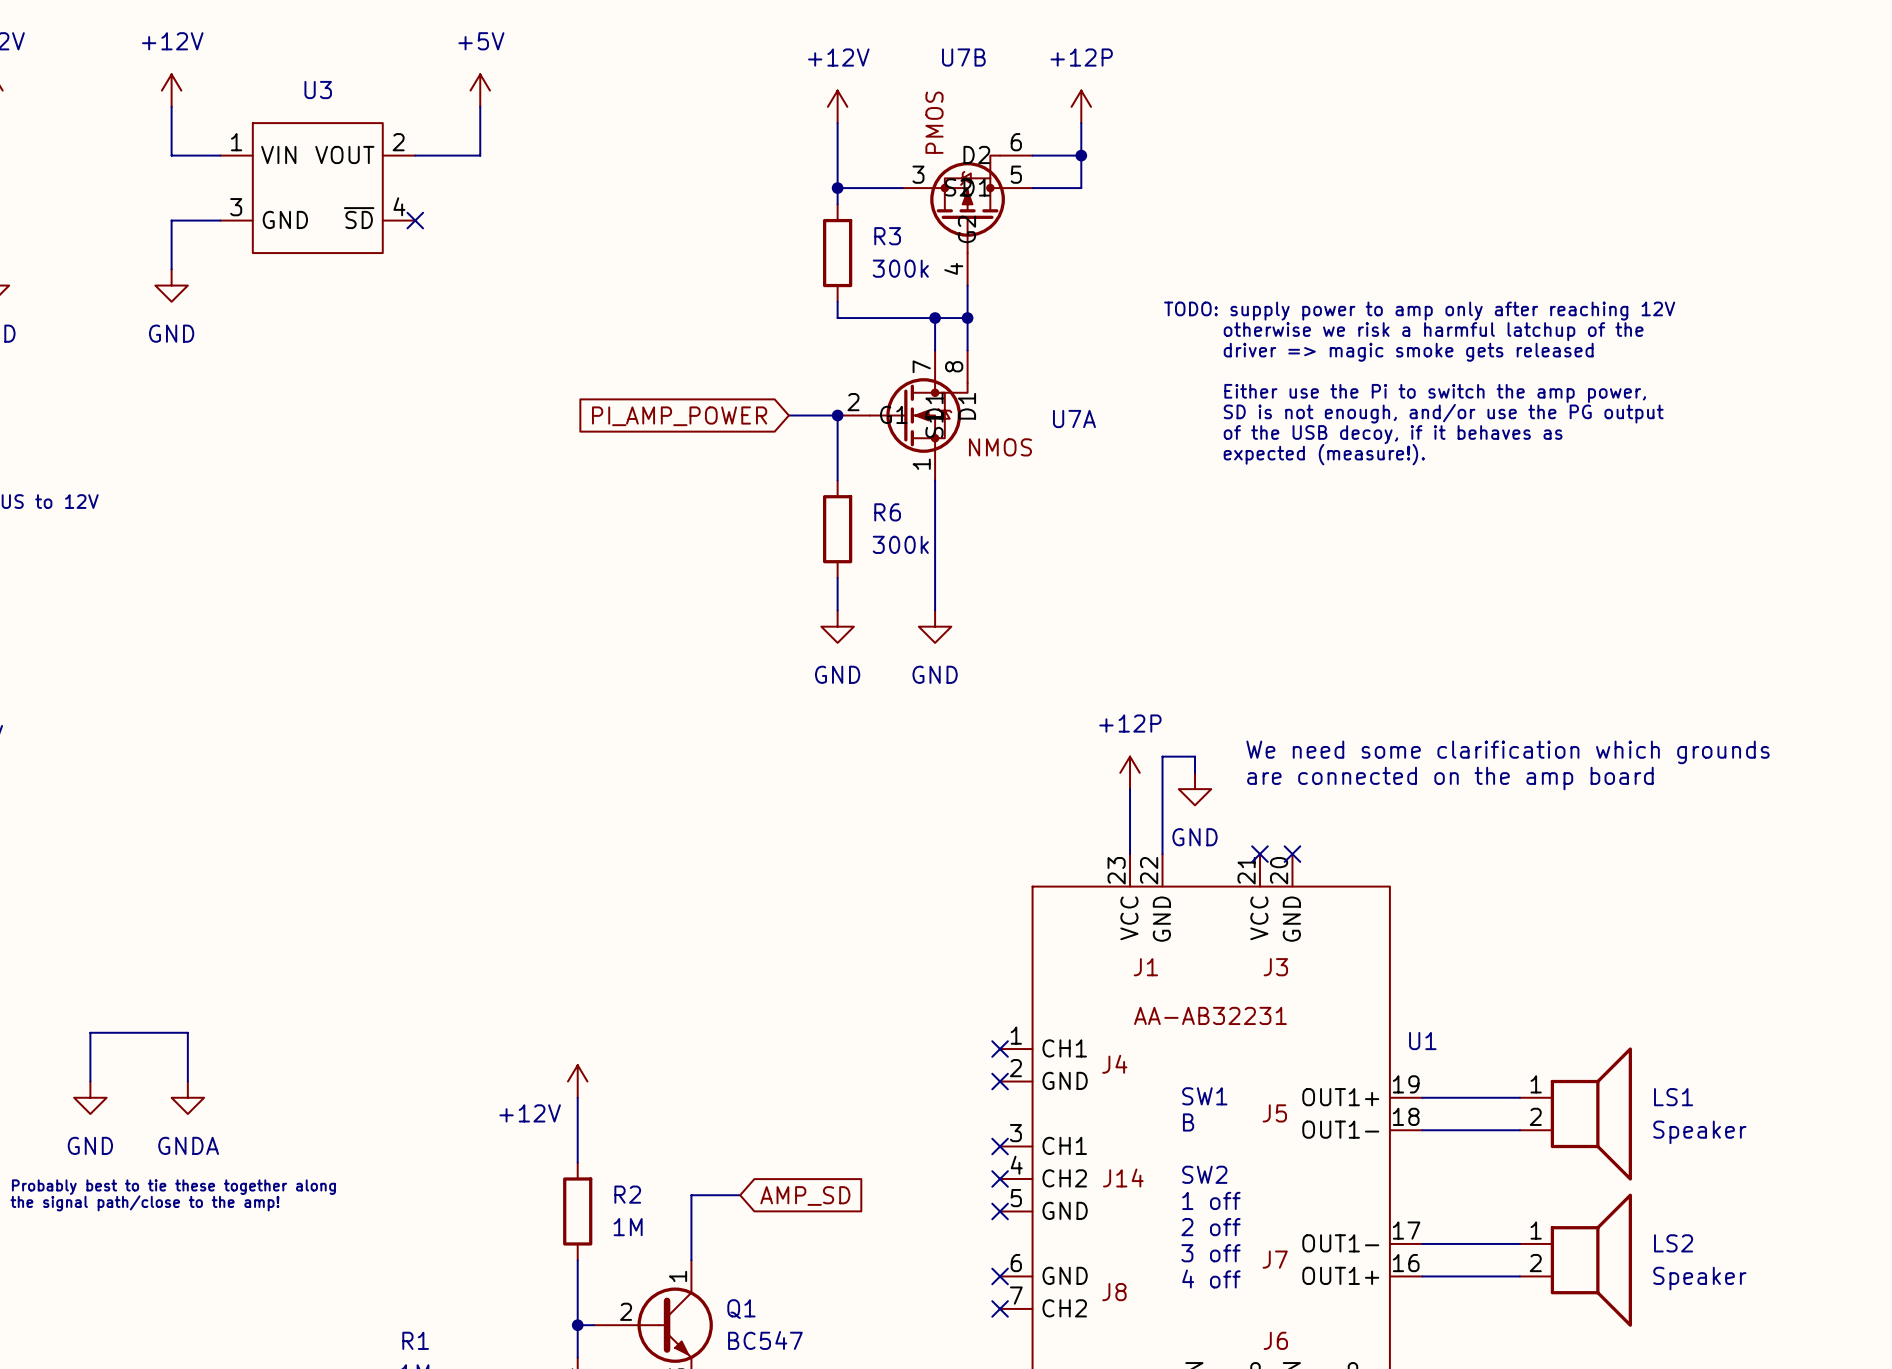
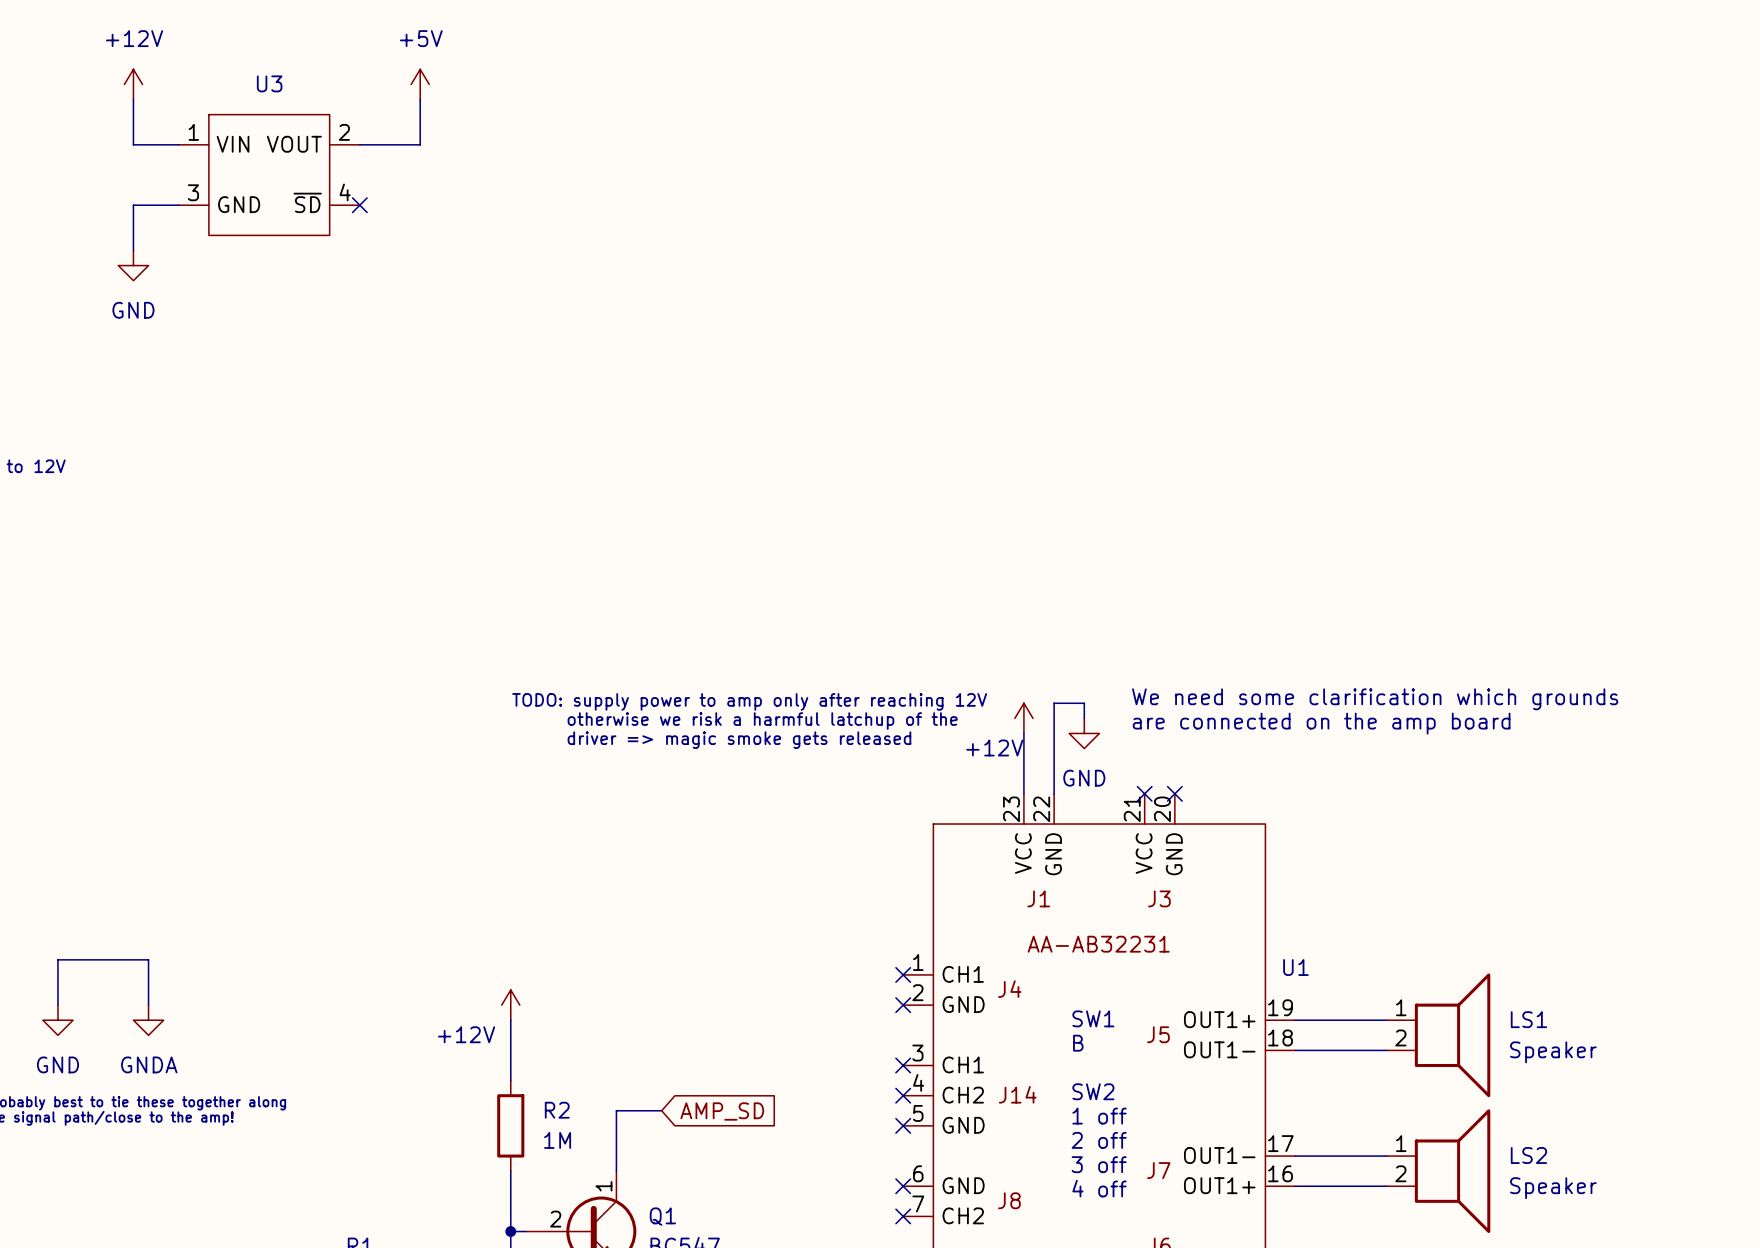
power symbol: +12V (837, 106) -> none
power symbol: +12P (1081, 106) -> none
wire: (837, 123) (837, 204) -> none
wire: (1081, 123) (1081, 188) (1032, 188) -> none
wire: (1032, 155) (1081, 155) -> none
junction: (1081, 155) -> none
wire: (837, 188) (902, 188) -> none
junction: (837, 188) -> none
U7B: (967, 220) -> none
R3: 300k (837, 253) -> none
wire: (967, 285) (967, 350) -> none
wire: (837, 301) (837, 318) (967, 318) -> none
text: TODO: supply power to amp only after reaching 12V (1419, 311) -> none
wire: (935, 318) (935, 350) -> none
junction: (935, 318) -> none
junction: (967, 318) -> none
text: otherwise we risk a harmful latchup of the (1433, 331) -> none
text: driver => magic smoke gets released (1408, 352) -> none
text: Either use the Pi to switch the amp power, (1435, 393) -> none
text: SD is not enough, and/or use the PG output (1443, 413) -> none
wire: (788, 415) (837, 415) (837, 480) -> none
junction: (837, 415) -> none
U7A: (902, 415) -> none
global label: PI_AMP_POWER (679, 416) -> none
text: of the USB decoy, if it behaves as (1393, 434) -> none
text: expected (measure!). (1324, 454) -> none
wire: (935, 480) (935, 610) -> none
R6: 300k (837, 529) -> none
wire: (837, 577) (837, 610) -> none
power symbol: GND (837, 626) -> none
power symbol: GND (935, 626) -> none
text: none -> TODO: supply power to amp only after reaching 12V (749, 701)
power symbol: +12P (1130, 772) -> +12V (1023, 718)
text: none -> otherwise we risk a harmful latchup of the (762, 721)
text: none -> driver => magic smoke gets released (739, 740)

